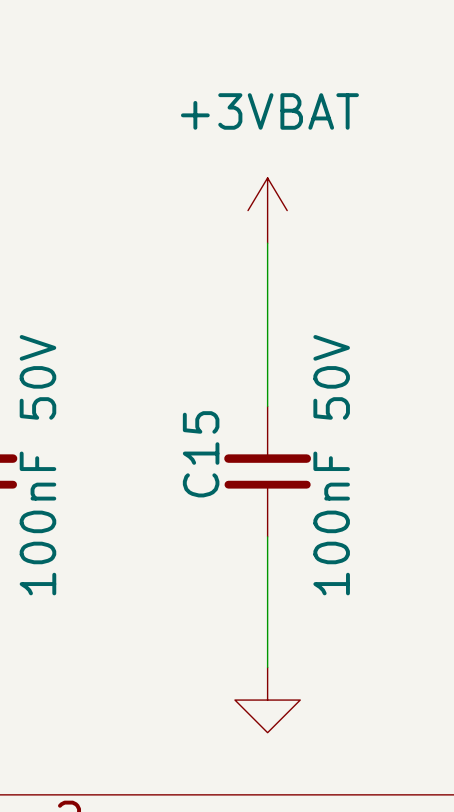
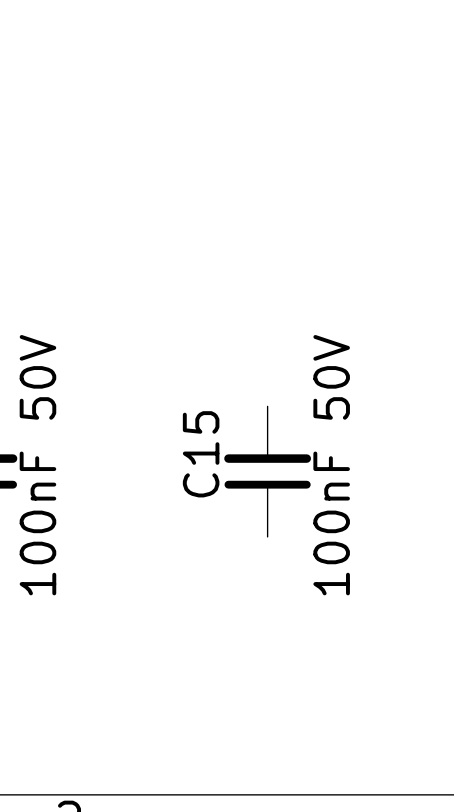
power symbol: +3VBAT (267, 210) -> none
wire: (267, 243) (267, 406) -> none
wire: (267, 536) (267, 667) -> none
power symbol: (267, 700) -> none

